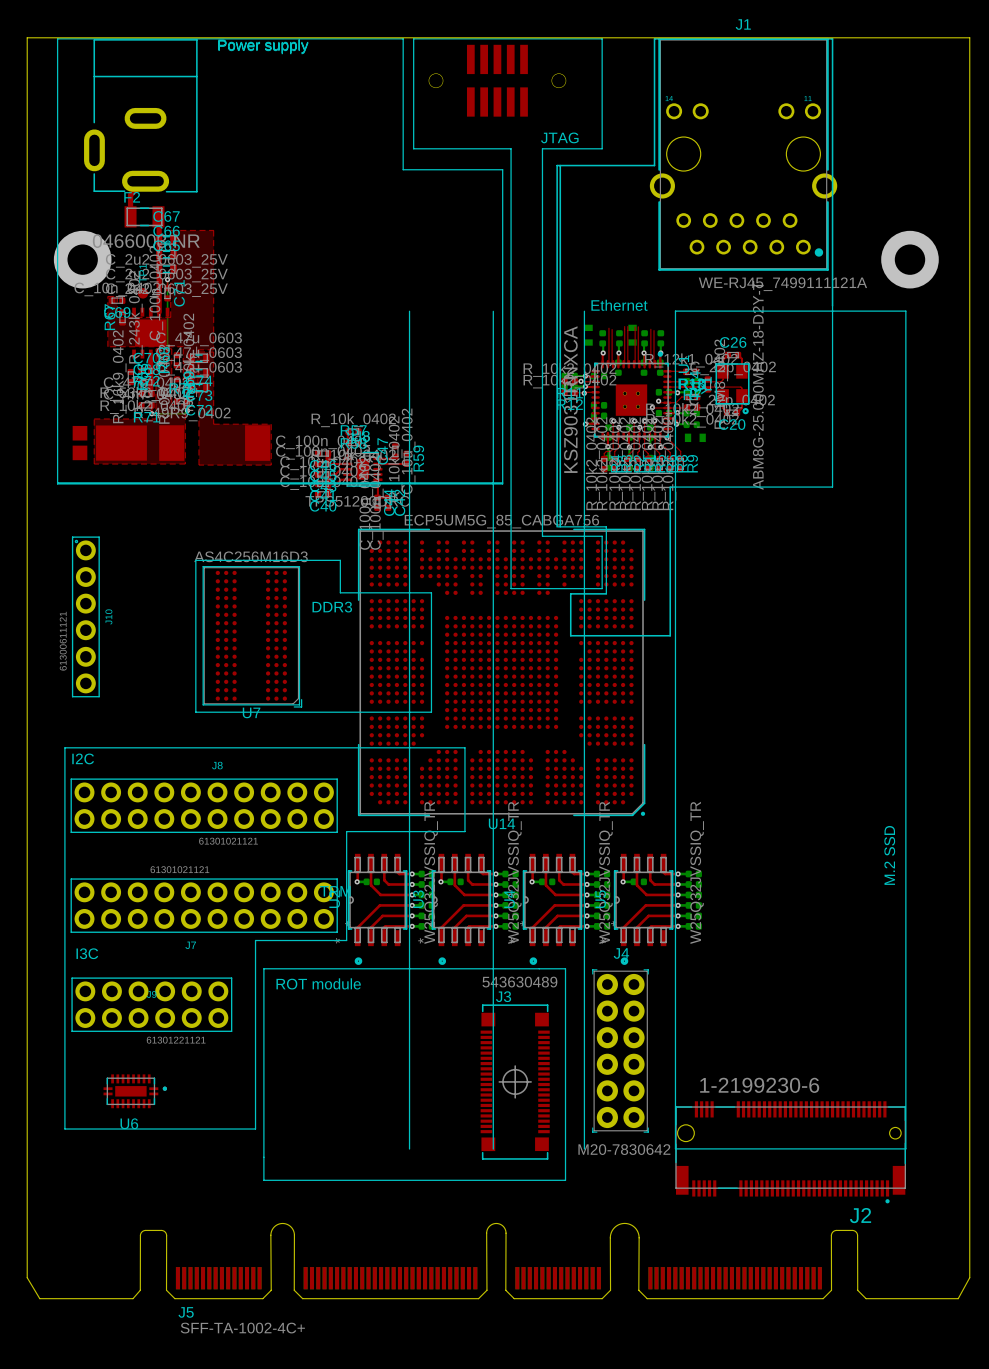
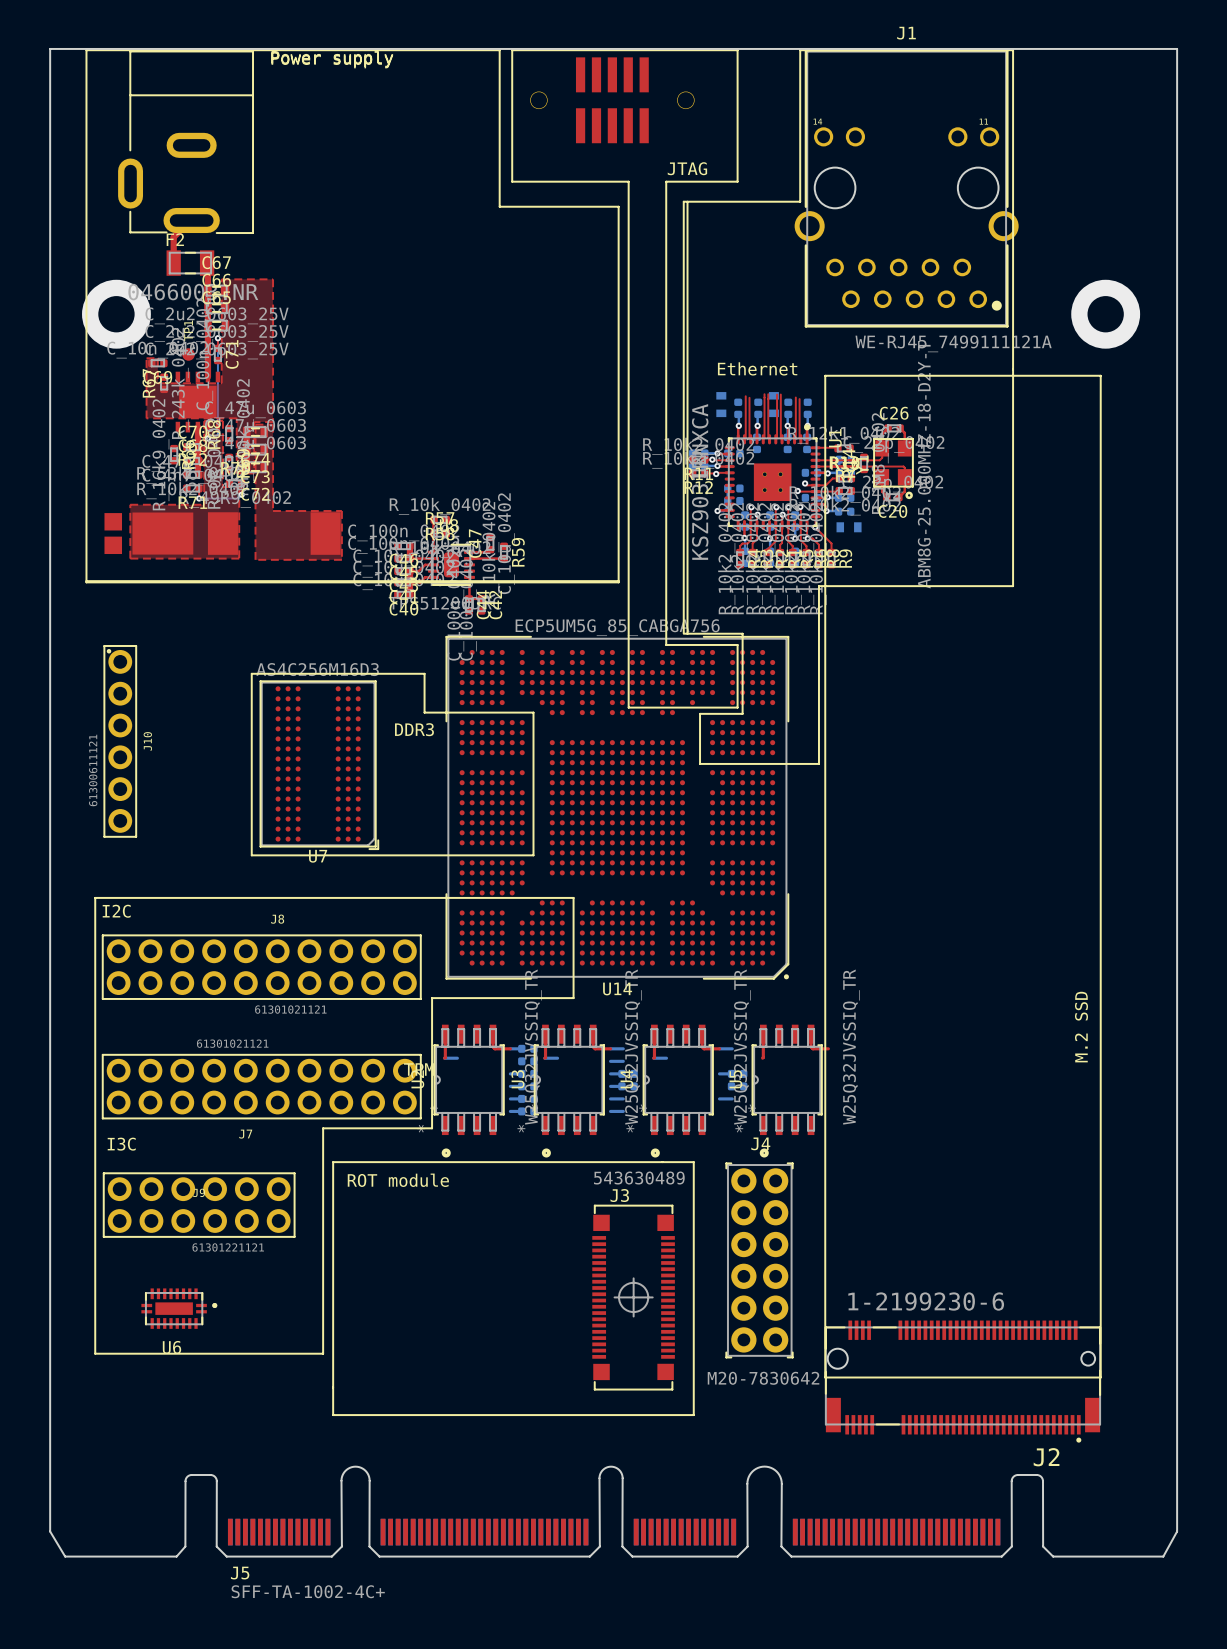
line: (409, 311) (409, 1149) -> none
line: (493, 311) (493, 1149) -> none
line: (584, 311) (584, 1149) -> none
top track: (371, 861) (371, 885) (380, 894) (412, 894) -> none
top track: (384, 861) (384, 880) (388, 884) (412, 884) -> none
top track: (454, 861) (454, 885) (464, 894) (495, 894) -> none
top track: (468, 861) (468, 880) (472, 884) (495, 884) -> none
top track: (545, 861) (545, 885) (555, 894) (587, 894) -> none
top track: (559, 861) (559, 880) (563, 884) (587, 884) -> none
top track: (636, 861) (636, 885) (646, 894) (678, 894) -> none
top track: (650, 861) (650, 880) (654, 884) (678, 884) -> none
via: (412, 874) -> none
via: (495, 874) -> none
part: (510, 874) -> none
via: (587, 874) -> none
part: (602, 874) -> none
bottom track: (678, 874) (688, 874) -> none
via: (678, 874) -> none
part: (693, 874) -> none
via: (357, 881) -> none
part: (371, 881) -> none
via: (440, 881) -> none
part: (455, 881) -> none
via: (532, 881) -> none
part: (547, 881) -> none
bottom track: (623, 881) (633, 881) -> none
via: (623, 881) -> none
part: (638, 881) -> none
bottom track: (412, 884) (422, 884) -> none
via: (412, 884) -> none
via: (495, 884) -> none
part: (510, 884) -> none
bottom track: (587, 884) (597, 884) -> none
via: (587, 884) -> none
part: (602, 884) -> none
bottom track: (678, 884) (688, 884) -> none
via: (678, 884) -> none
part: (693, 884) -> none
via: (412, 894) -> none
via: (495, 894) -> none
via: (587, 894) -> none
bottom track: (678, 894) (688, 894) -> none
via: (678, 894) -> none
part: (693, 894) -> none
top track: (412, 905) (379, 905) (357, 927) (357, 938) -> none
via: (412, 905) -> none
top track: (495, 905) (463, 905) (441, 927) (441, 938) -> none
via: (495, 905) -> none
top track: (587, 905) (554, 905) (532, 927) (532, 938) -> none
bottom track: (587, 905) (597, 905) -> none
via: (587, 905) -> none
top track: (678, 905) (645, 905) (623, 927) (623, 938) -> none
bottom track: (678, 905) (688, 905) -> none
via: (678, 905) -> none
part: (693, 905) -> none
top track: (412, 915) (382, 915) (371, 927) (371, 938) -> none
via: (412, 915) -> none
top track: (495, 915) (466, 915) (454, 927) (454, 938) -> none
via: (495, 915) -> none
part: (510, 915) -> none
top track: (587, 915) (557, 915) (545, 927) (545, 938) -> none
via: (587, 915) -> none
part: (602, 915) -> none
top track: (678, 915) (648, 915) (636, 927) (636, 938) -> none
bottom track: (678, 915) (688, 915) -> none
via: (678, 915) -> none
part: (693, 915) -> none
top track: (412, 926) (385, 926) (384, 938) -> none
via: (412, 926) -> none
top track: (495, 926) (469, 926) (468, 938) -> none
via: (495, 926) -> none
part: (510, 926) -> none
top track: (587, 926) (560, 926) (559, 938) -> none
bottom track: (587, 926) (597, 926) -> none
via: (587, 926) -> none
part: (602, 926) -> none
top track: (678, 926) (651, 926) (650, 938) -> none
bottom track: (678, 926) (688, 926) -> none
via: (678, 926) -> none
part: (693, 926) -> none

